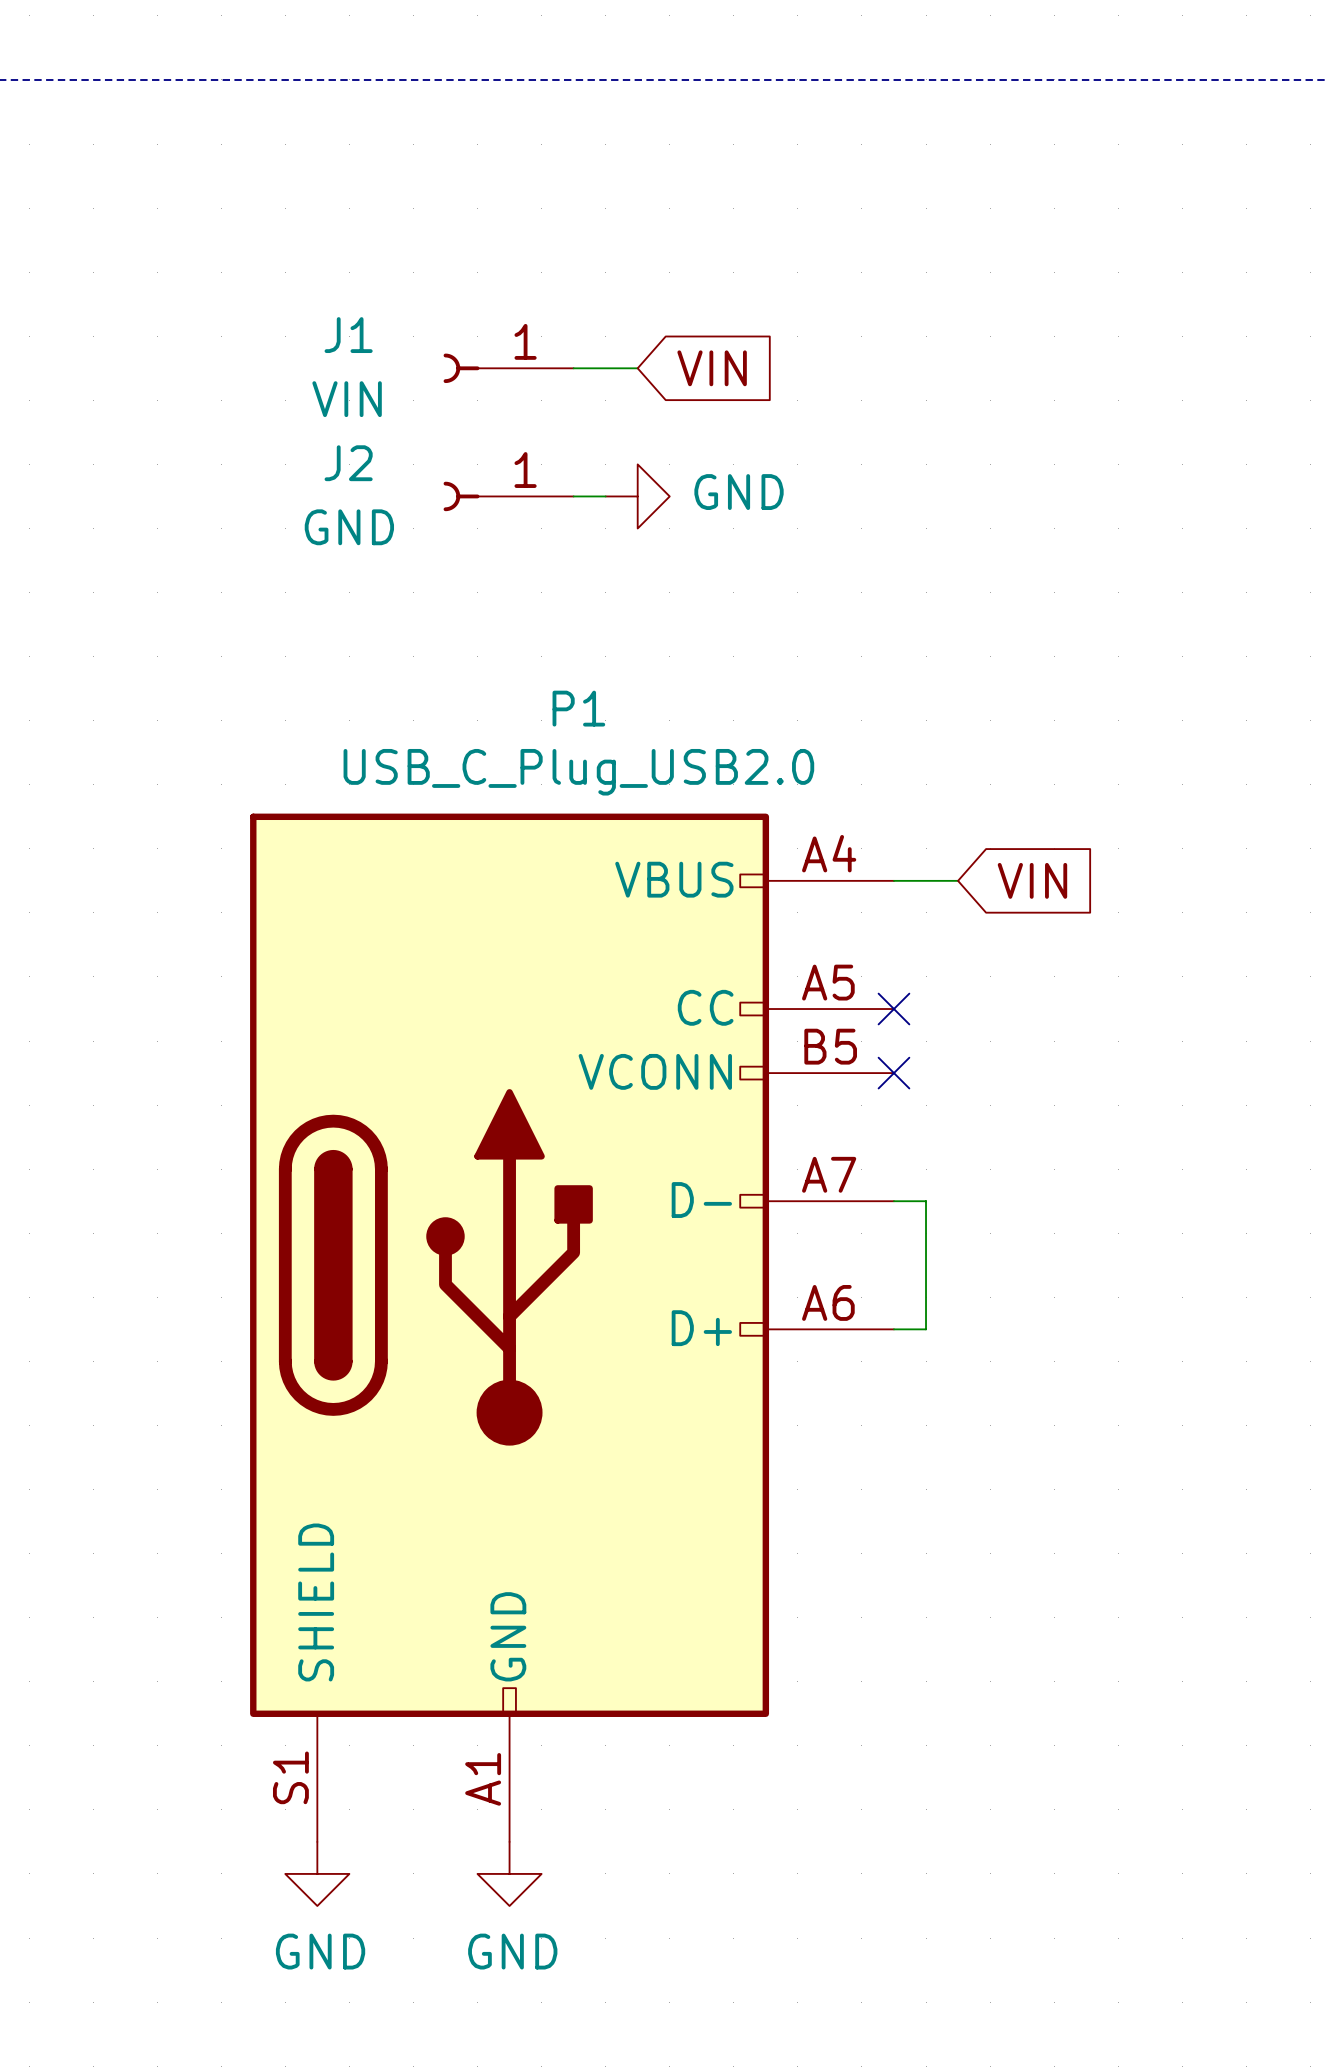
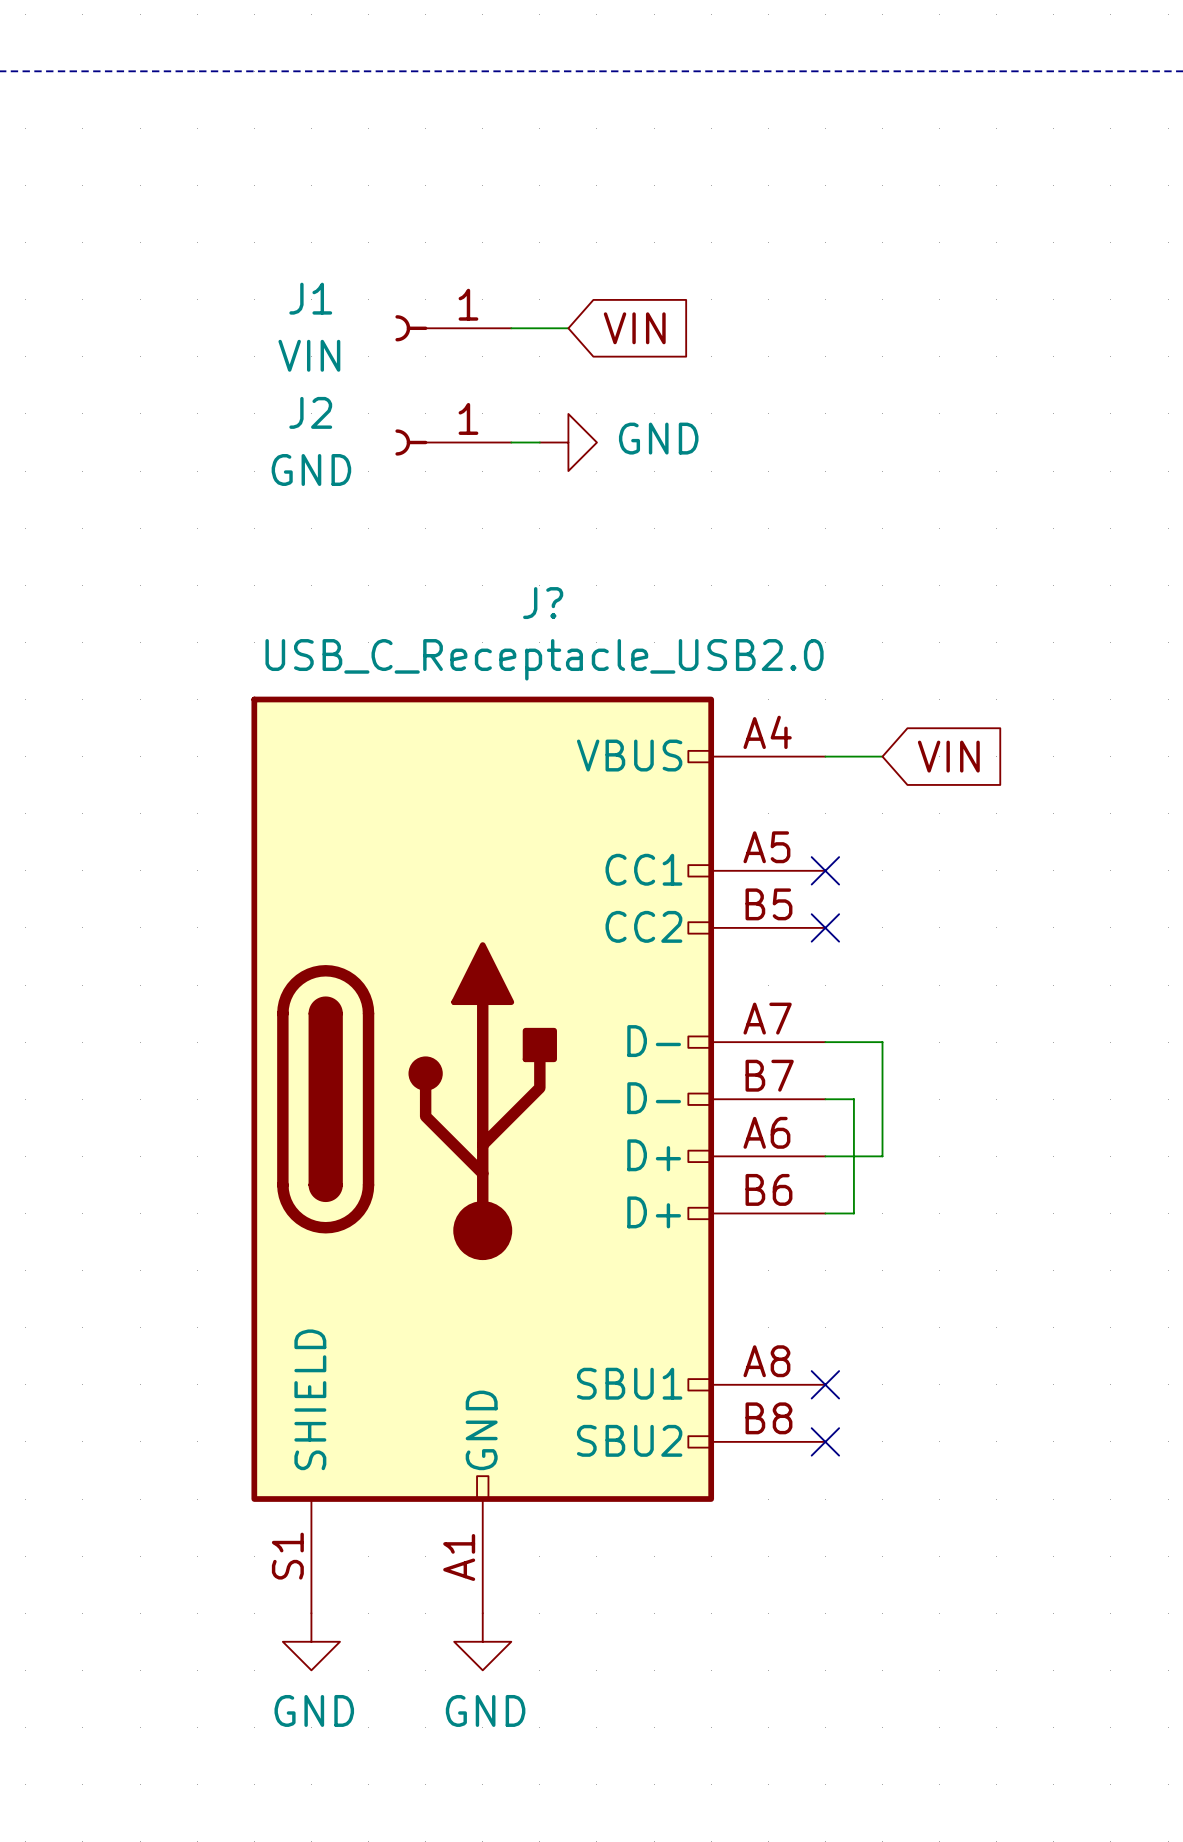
wire: (893, 880) (958, 880) -> (825, 756) (882, 756)
global label position: VIN (1032, 880) -> VIN (948, 756)
no-connect mark: none -> (825, 870)
no-connect mark: (893, 1009) -> none
no-connect mark: none -> (825, 927)
no-connect mark: (893, 1073) -> none
wire: none -> (825, 1042) (882, 1042) (882, 1156) (825, 1156)
wire: (893, 1201) (926, 1201) (926, 1329) (893, 1329) -> (825, 1099) (853, 1099) (853, 1213) (825, 1213)
J?: none -> USB_C_Receptacle_USB2.0 (538, 1154)
P1: USB_C_Plug_USB2.0 (572, 1327) -> none
no-connect mark: none -> (825, 1384)
no-connect mark: none -> (825, 1441)
power symbol position: GND (317, 1873) -> GND (311, 1641)
power symbol position: GND (509, 1873) -> GND (482, 1641)

